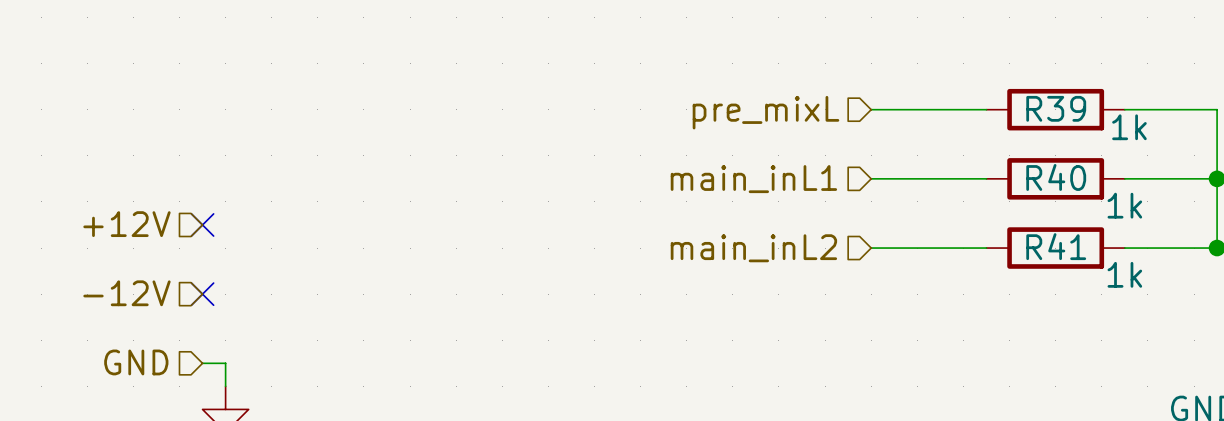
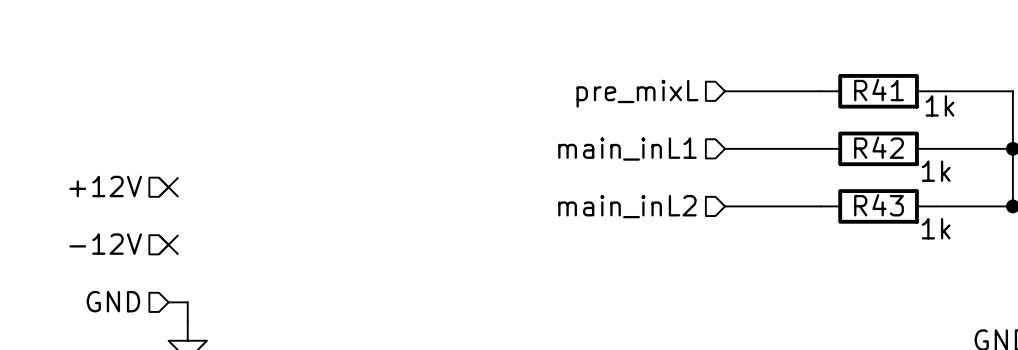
R39 name: R39 (1056, 108) -> R41 (879, 90)
R40 name: R40 (1056, 177) -> R42 (879, 147)
R41 name: R41 (1056, 246) -> R43 (879, 205)

